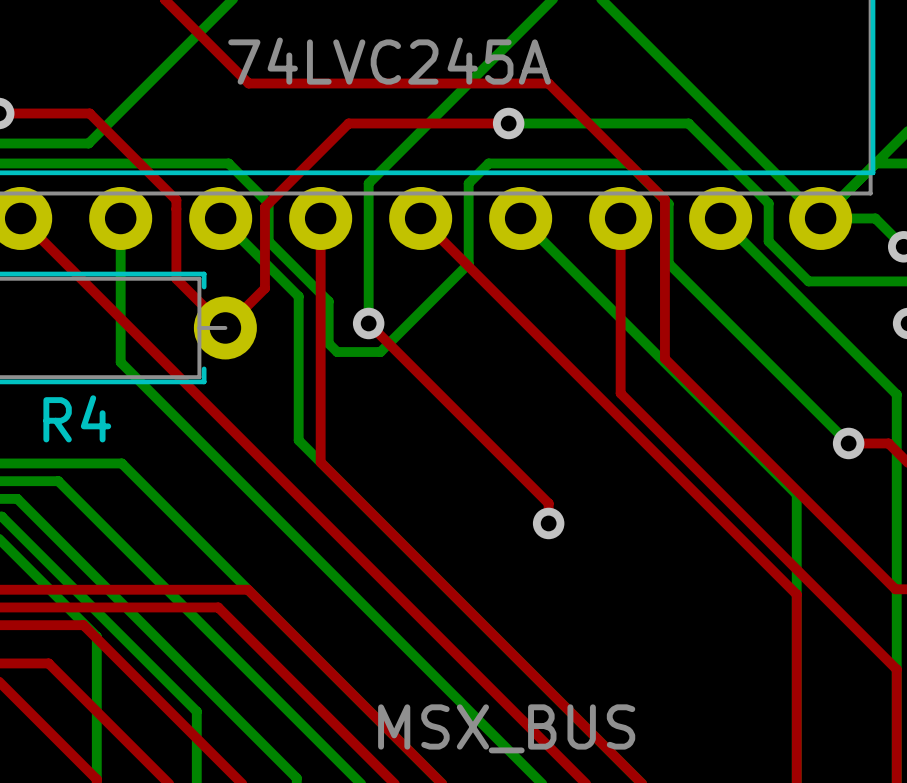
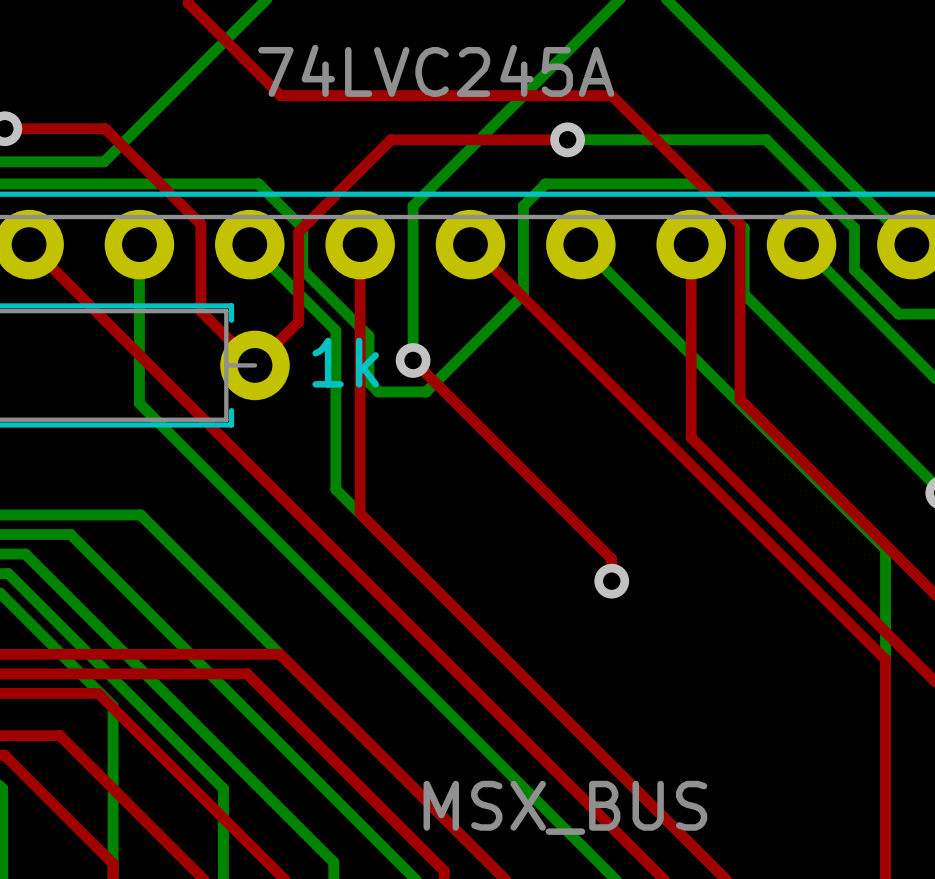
R4 value: none -> 1k (345, 362)
R4 name: R4 (77, 418) -> none

